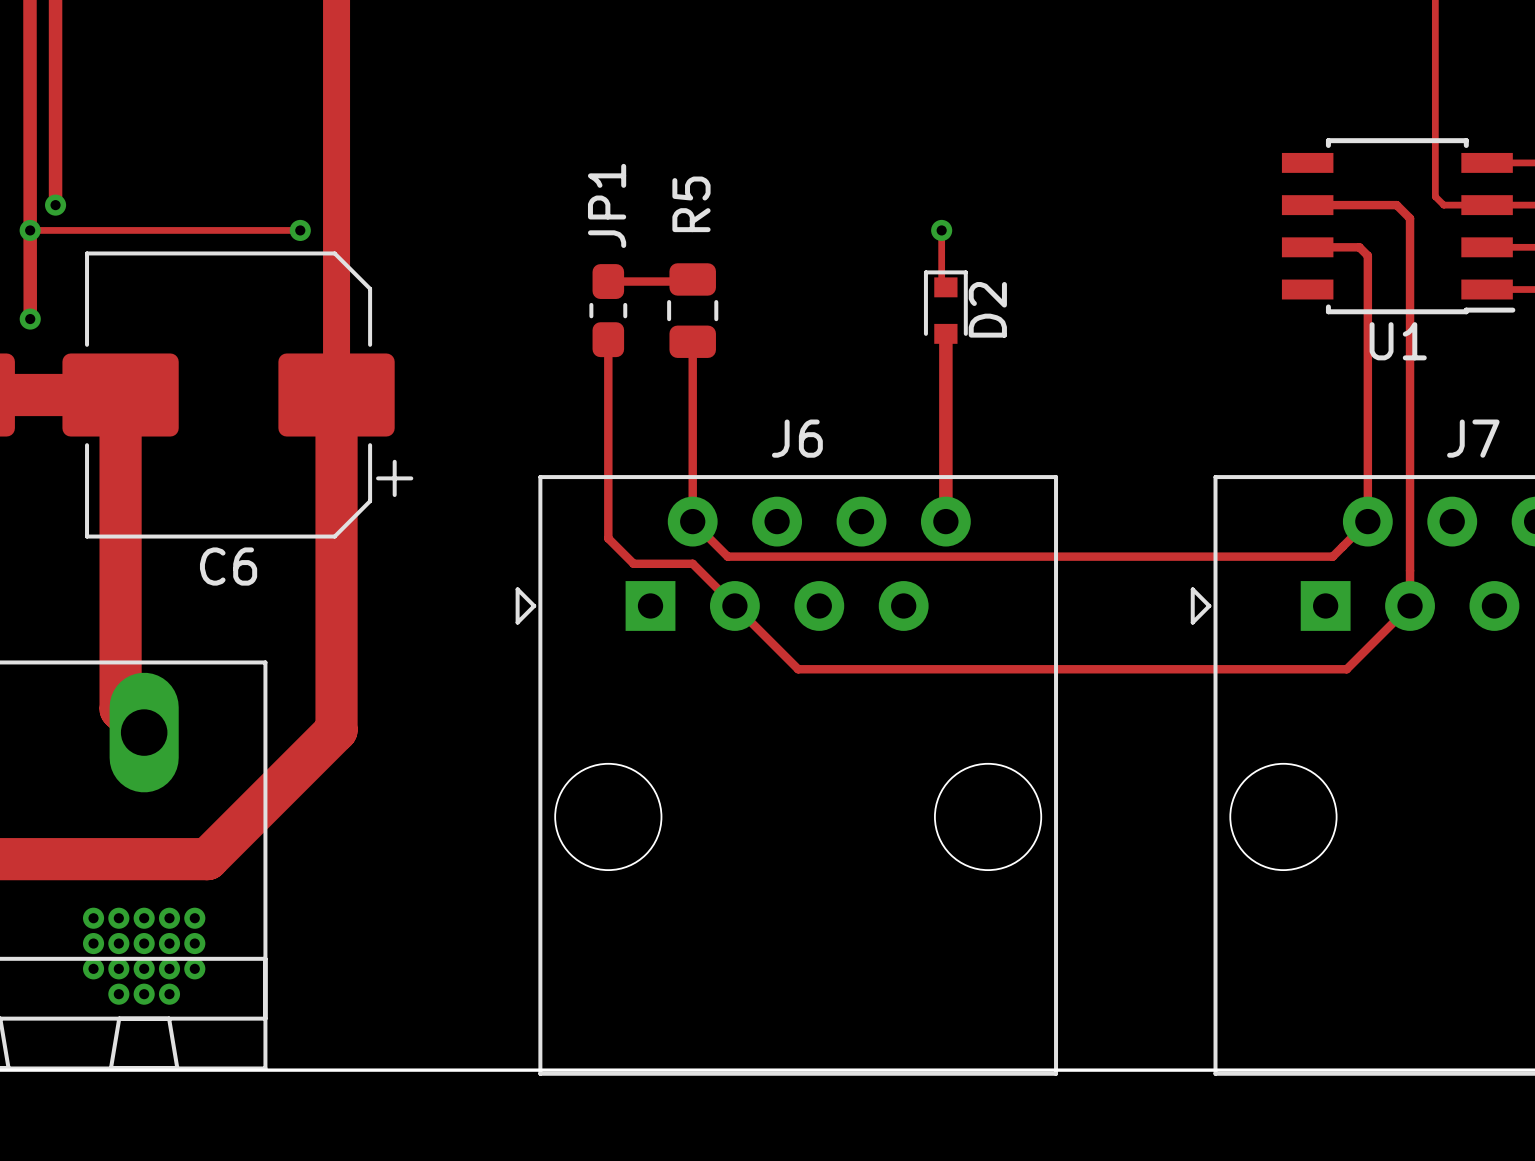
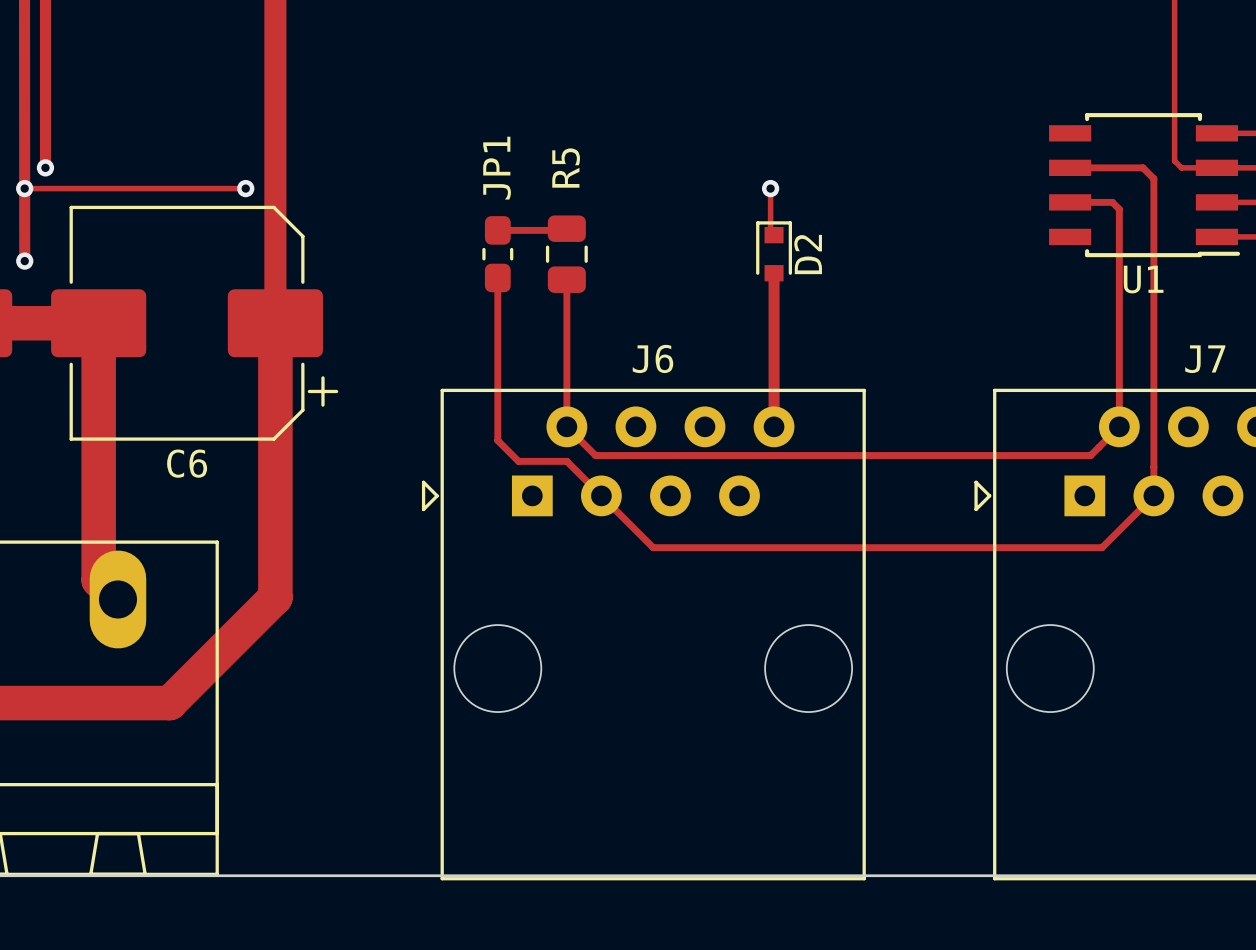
via: (93, 918) -> none
via: (118, 918) -> none
via: (144, 918) -> none
via: (169, 918) -> none
via: (194, 918) -> none
via: (93, 943) -> none
via: (118, 943) -> none
via: (144, 943) -> none
via: (169, 943) -> none
via: (194, 943) -> none
via: (93, 968) -> none
via: (118, 968) -> none
via: (144, 968) -> none
via: (169, 968) -> none
via: (194, 968) -> none
via: (118, 994) -> none
via: (144, 994) -> none
via: (169, 994) -> none

